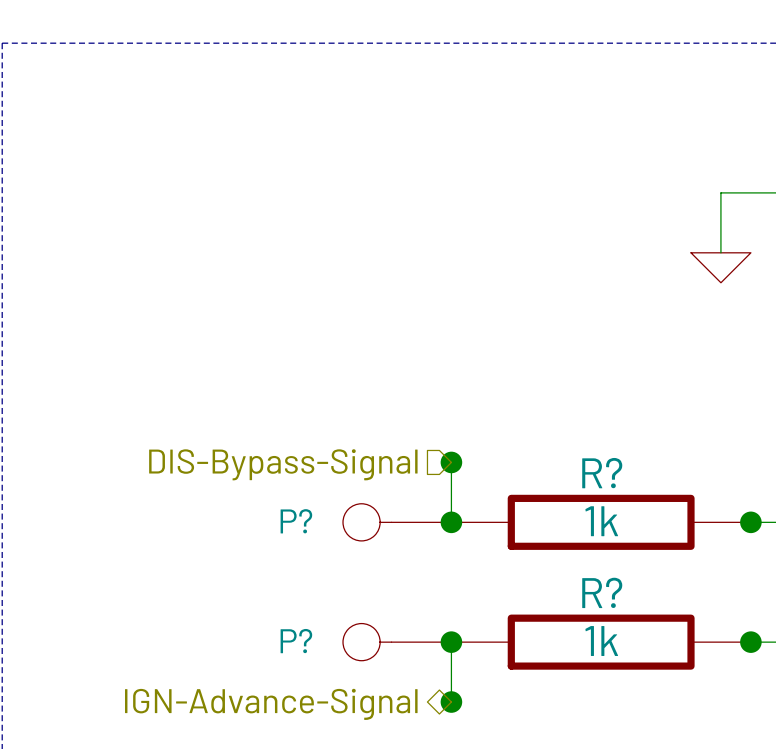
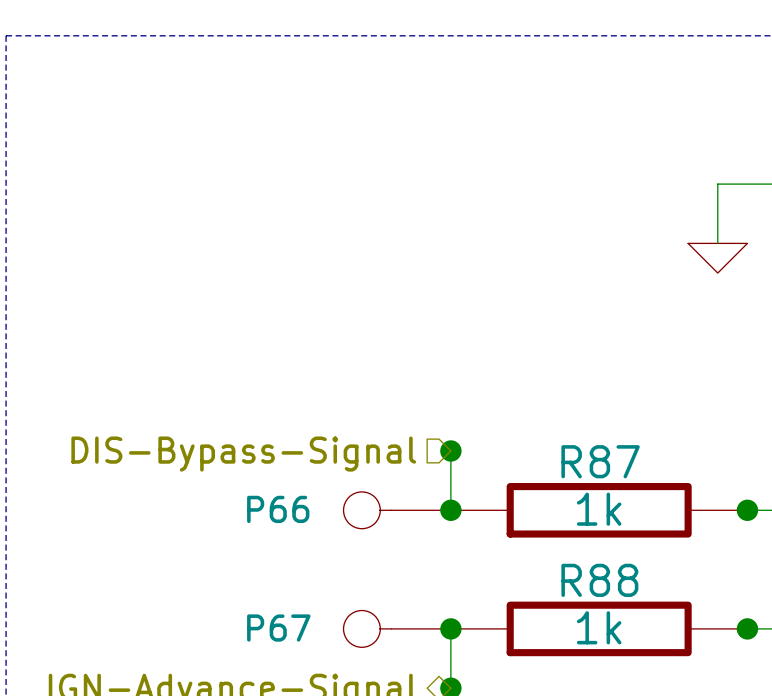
R? name: R? (602, 473) -> R87 (600, 461)
P? name: P? (296, 521) -> P66 (278, 509)
R? name: R? (602, 592) -> R88 (599, 580)
P? name: P? (296, 641) -> P67 (278, 628)

